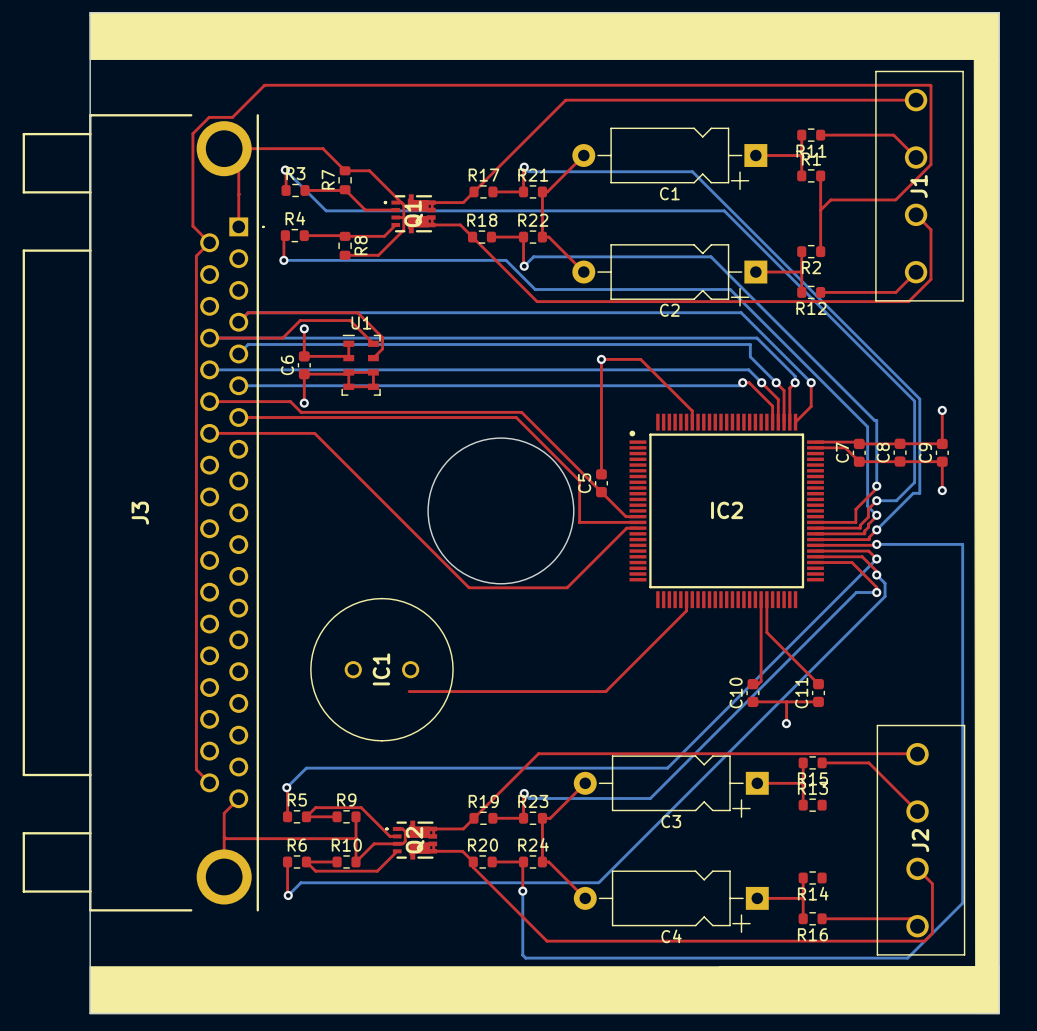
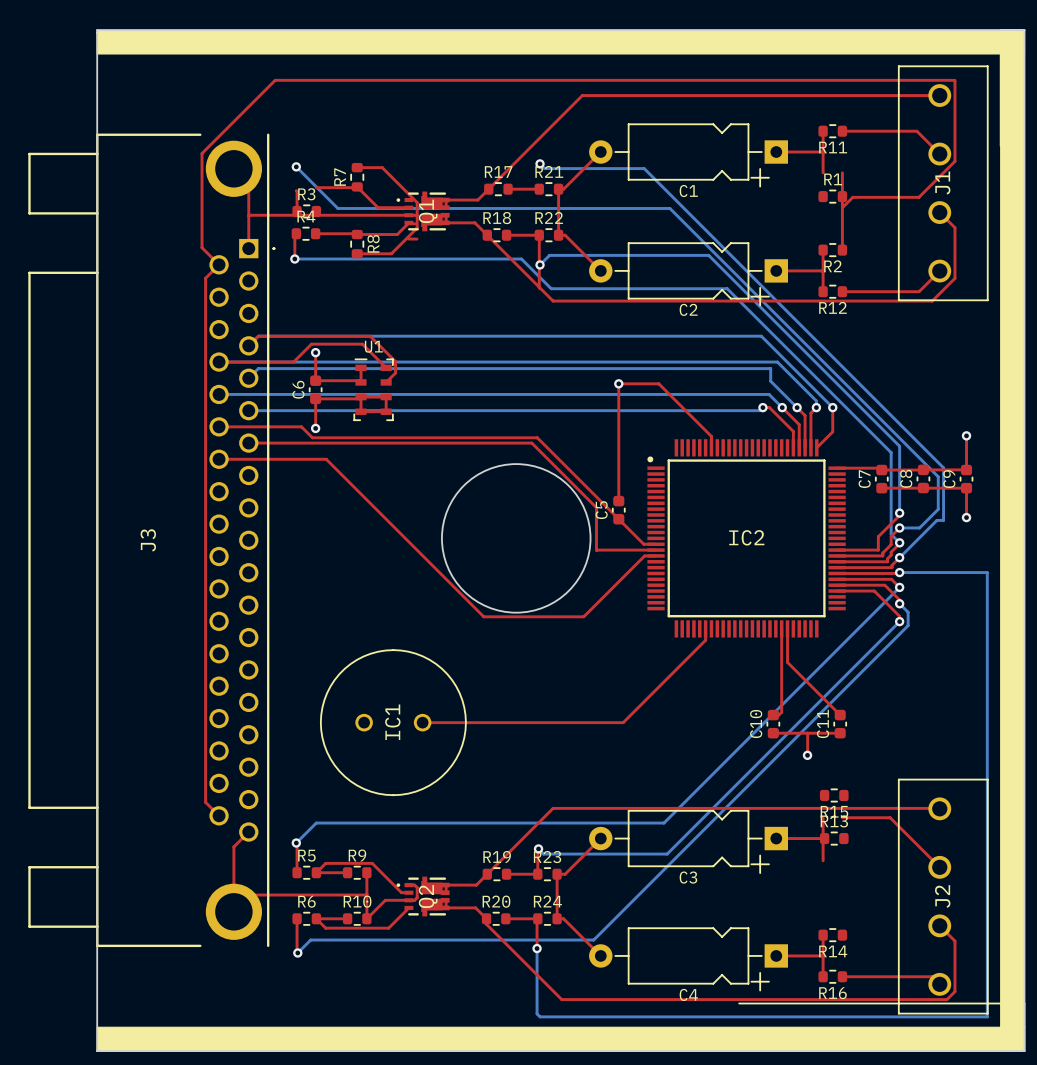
drawing: [89, 12, 1000, 1015] -> none
drawing: none -> [96, 29, 1026, 1052]
top track: (930, 85) (264, 85) (232, 117) (209, 117) -> (954, 104) (954, 80) (275, 80) (218, 136)
top track: (916, 100) (565, 100) (463, 202) (432, 202) (432, 210) -> (939, 95) (582, 95) (477, 200) (446, 200) (446, 207)
R11 position: (811, 135) -> (832, 131)
top track: (820, 135) (893, 135) (916, 157) -> (842, 131) (916, 131) (939, 154)
top track: (930, 141) (930, 164) (895, 199) (830, 199) (820, 210) -> (954, 161) (918, 197) (852, 197) (842, 207)
top track: (224, 148) (322, 148) (345, 170) (369, 170) (403, 205) -> (357, 167) (382, 167) (417, 202) (417, 226)
top track: (801, 152) (801, 175) -> (823, 131) (823, 154)
top track: (583, 155) (547, 191) (542, 191) -> (600, 152) (563, 189) (558, 189) (558, 212)
top track: (755, 155) (801, 156) -> (776, 152) (823, 152)
C1 position: (669, 158) -> (688, 155)
bottom track: (524, 167) (528, 171) (692, 171) (919, 399) (919, 441) -> (540, 163) (544, 168) (644, 168) (943, 467)
via position: (524, 167) -> (540, 163)
top track: (523, 168) (523, 191) (492, 191) -> (539, 189) (508, 189)
bottom track: (285, 170) (326, 210) (724, 210) (914, 401) (914, 450) -> (296, 166) (337, 208) (669, 208) (938, 476)
via position: (285, 170) -> (296, 166)
R7 position: (345, 180) -> (357, 177)
J1 position: (919, 186) -> (943, 183)
top track: (305, 190) (345, 189) (365, 210) (395, 210) -> (316, 187) (357, 186) (377, 207) (408, 207)
R17 position: (483, 191) -> (498, 189)
R21 position: (532, 191) -> (548, 189)
top track: none -> (249, 215) (417, 215)
top track: (403, 206) (403, 229) (378, 255) (345, 255) -> (417, 227) (391, 253) (357, 253)
Q1 position: (409, 213) -> (423, 211)
top track: (542, 213) (542, 237) (548, 237) (583, 272) -> (558, 235) (565, 235) (600, 270)
top track: (916, 214) (930, 229) -> (939, 212) (954, 227) (954, 251)
top track: (432, 217) (432, 224) (460, 224) (537, 301) (908, 301) (930, 279) (930, 256) -> (446, 215) (446, 222) (474, 222) (553, 301) (932, 301) (954, 278)
top track: (395, 224) (384, 236) (304, 235) -> (408, 222) (397, 234) (315, 233)
top track: (820, 228) (820, 251) -> (842, 172) (842, 196)
top track: (285, 235) (283, 260) -> (296, 233) (294, 259)
R4 position: (294, 235) -> (305, 233)
R18 position: (482, 237) -> (496, 235)
top track: (491, 237) (523, 237) -> (506, 235) (539, 235) (539, 259)
R22 position: (532, 237) -> (548, 235)
R8 position: (345, 245) -> (357, 244)
R2 position: (811, 251) -> (832, 250)
bottom track: (283, 260) (506, 260) (535, 289) (730, 289) (867, 426) (868, 506) -> (294, 259) (521, 259) (551, 288) (727, 288) (891, 452) (891, 534)
via position: (283, 260) -> (294, 259)
bottom track: (524, 266) (533, 256) (711, 256) (876, 420) -> (540, 264) (549, 255) (708, 255) (899, 446)
via position: (524, 266) -> (540, 264)
top track: (801, 269) (801, 292) -> (823, 250) (823, 273)
top track: (755, 272) (801, 272) -> (776, 270) (823, 271)
top track: (916, 272) (895, 292) (820, 292) -> (939, 271) (919, 291) (842, 291)
C2 position: (669, 275) -> (688, 274)
R12 position: (811, 292) -> (832, 291)
top track: (815, 447) (845, 447) (859, 461) -> none
bottom track: (876, 592) (856, 592) (650, 798) (529, 798) (524, 793) -> (899, 621) (667, 854) (543, 854) (538, 848)
IC1 position: (381, 669) -> (393, 722)
top track: (917, 754) (538, 753) (463, 828) (433, 828) (433, 836) -> (939, 808) (553, 808) (476, 885) (446, 885) (446, 892)
top track: (803, 762) (803, 805) -> (823, 817) (823, 860)
top track: (822, 762) (868, 762) (917, 811) -> (842, 817) (890, 817) (939, 867)
bottom track: (667, 768) (306, 768) (286, 787) -> (686, 800) (664, 823) (316, 823) (296, 843)
top track: (585, 783) (550, 818) (542, 818) (542, 861) (548, 861) (585, 898) -> (600, 838) (565, 874) (557, 874) (557, 918) (563, 918) (600, 955)
top track: (757, 783) (803, 784) -> (776, 838) (823, 839)
C3 position: (671, 786) -> (688, 841)
top track: (286, 787) (287, 816) -> (296, 843) (297, 872)
via position: (286, 787) -> (296, 843)
top track: (524, 793) (523, 818) (492, 818) -> (538, 848) (537, 874) (506, 874)
via position: (524, 793) -> (538, 848)
R5 position: (297, 816) -> (306, 872)
top track: (337, 816) (306, 816) (315, 807) (361, 807) (389, 836) (397, 836) -> none
R9 position: (346, 816) -> (357, 872)
top track: (356, 816) (356, 861) (374, 843) (402, 843) (405, 841) (405, 831) (402, 828) (397, 828) -> (366, 872) (366, 918) (385, 900) (414, 900) (417, 897) (417, 887) (414, 885) (408, 885)
R19 position: (483, 818) -> (496, 874)
R23 position: (532, 818) -> (547, 874)
top track: (224, 837) (305, 838) -> (408, 892) (401, 892) (372, 863) (325, 863) (316, 872)
top track: (356, 837) (335, 838) -> none
Q2 position: (411, 840) -> (423, 896)
J2 position: (920, 840) -> (943, 896)
top track: (433, 843) (433, 851) (462, 851) (473, 861) (473, 867) (546, 941) (924, 941) (932, 933) (932, 883) (917, 868) -> (446, 900) (446, 907) (475, 907) (486, 918) (486, 924) (561, 999) (947, 999) (954, 991) (954, 941) (939, 925)
top track: (397, 851) (377, 871) (315, 871) (306, 861) (337, 861) -> (408, 907) (388, 928) (325, 928) (316, 918) (347, 918)
top track: none -> (366, 894) (250, 895)
top track: (287, 861) (288, 895) -> (297, 918) (297, 952)
R6 position: (297, 861) -> (306, 918)
R10 position: (346, 861) -> (357, 918)
R20 position: (482, 861) -> (496, 918)
top track: (492, 861) (523, 861) (522, 891) -> (505, 918) (537, 918) (537, 948)
R24 position: (532, 861) -> (547, 918)
top track: (803, 878) (803, 918) -> (823, 935) (823, 976)
R14 position: (812, 878) -> (832, 935)
bottom track: (598, 882) (300, 882) (288, 895) -> (616, 917) (593, 940) (310, 940) (297, 952)
bottom track: (522, 891) (522, 955) (525, 958) (907, 958) (962, 903) -> (537, 948) (537, 1013) (540, 1016) (987, 1016) (987, 938)
via position: (522, 891) -> (537, 948)
via position: (288, 895) -> (297, 952)
top track: (757, 898) (803, 899) -> (776, 955) (823, 956)
C4 position: (671, 901) -> (688, 959)
R16 position: (812, 918) -> (832, 976)
top track: (822, 918) (910, 918) (917, 926) -> (842, 976) (932, 976) (939, 984)

